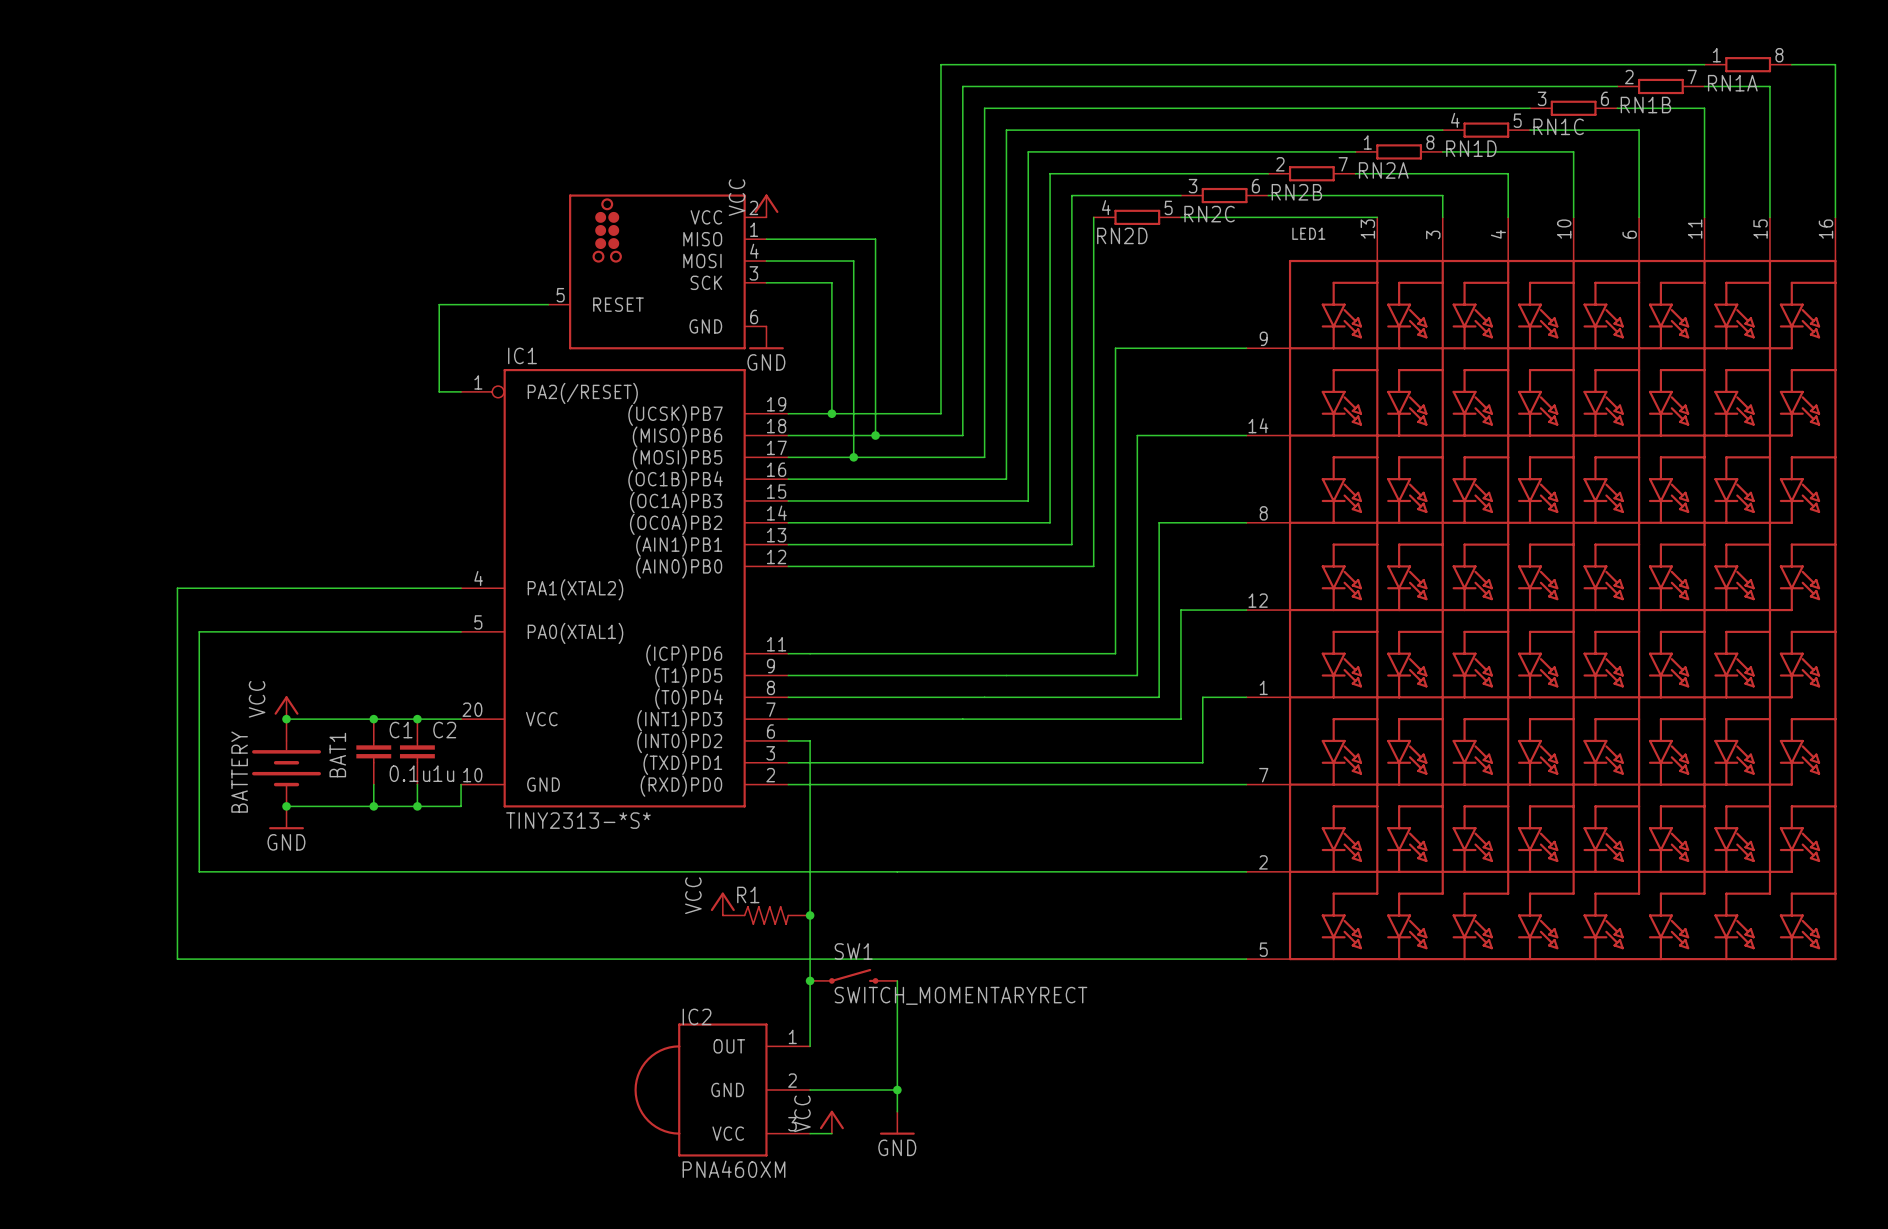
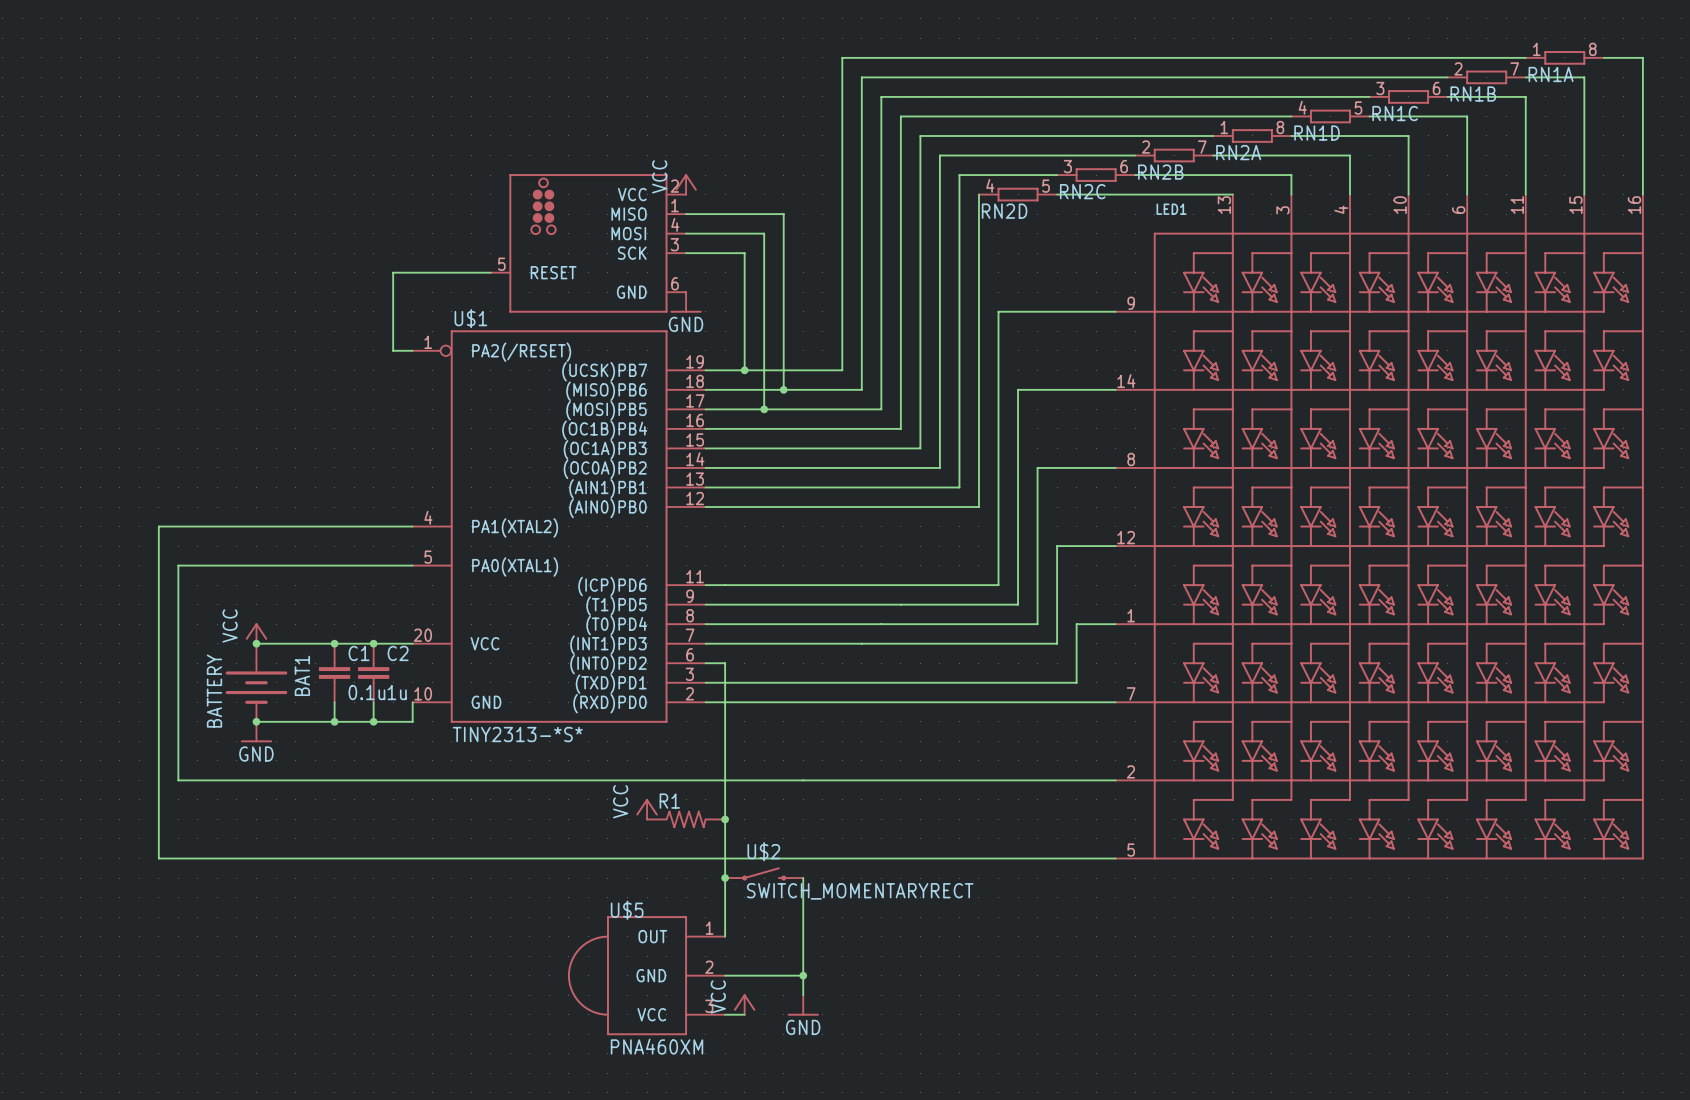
IC1 name: IC1 (522, 355) -> U$1 (470, 318)
SW1 name: SW1 (853, 951) -> U$2 (763, 851)
IC2 name: IC2 (697, 1016) -> U$5 (627, 910)

